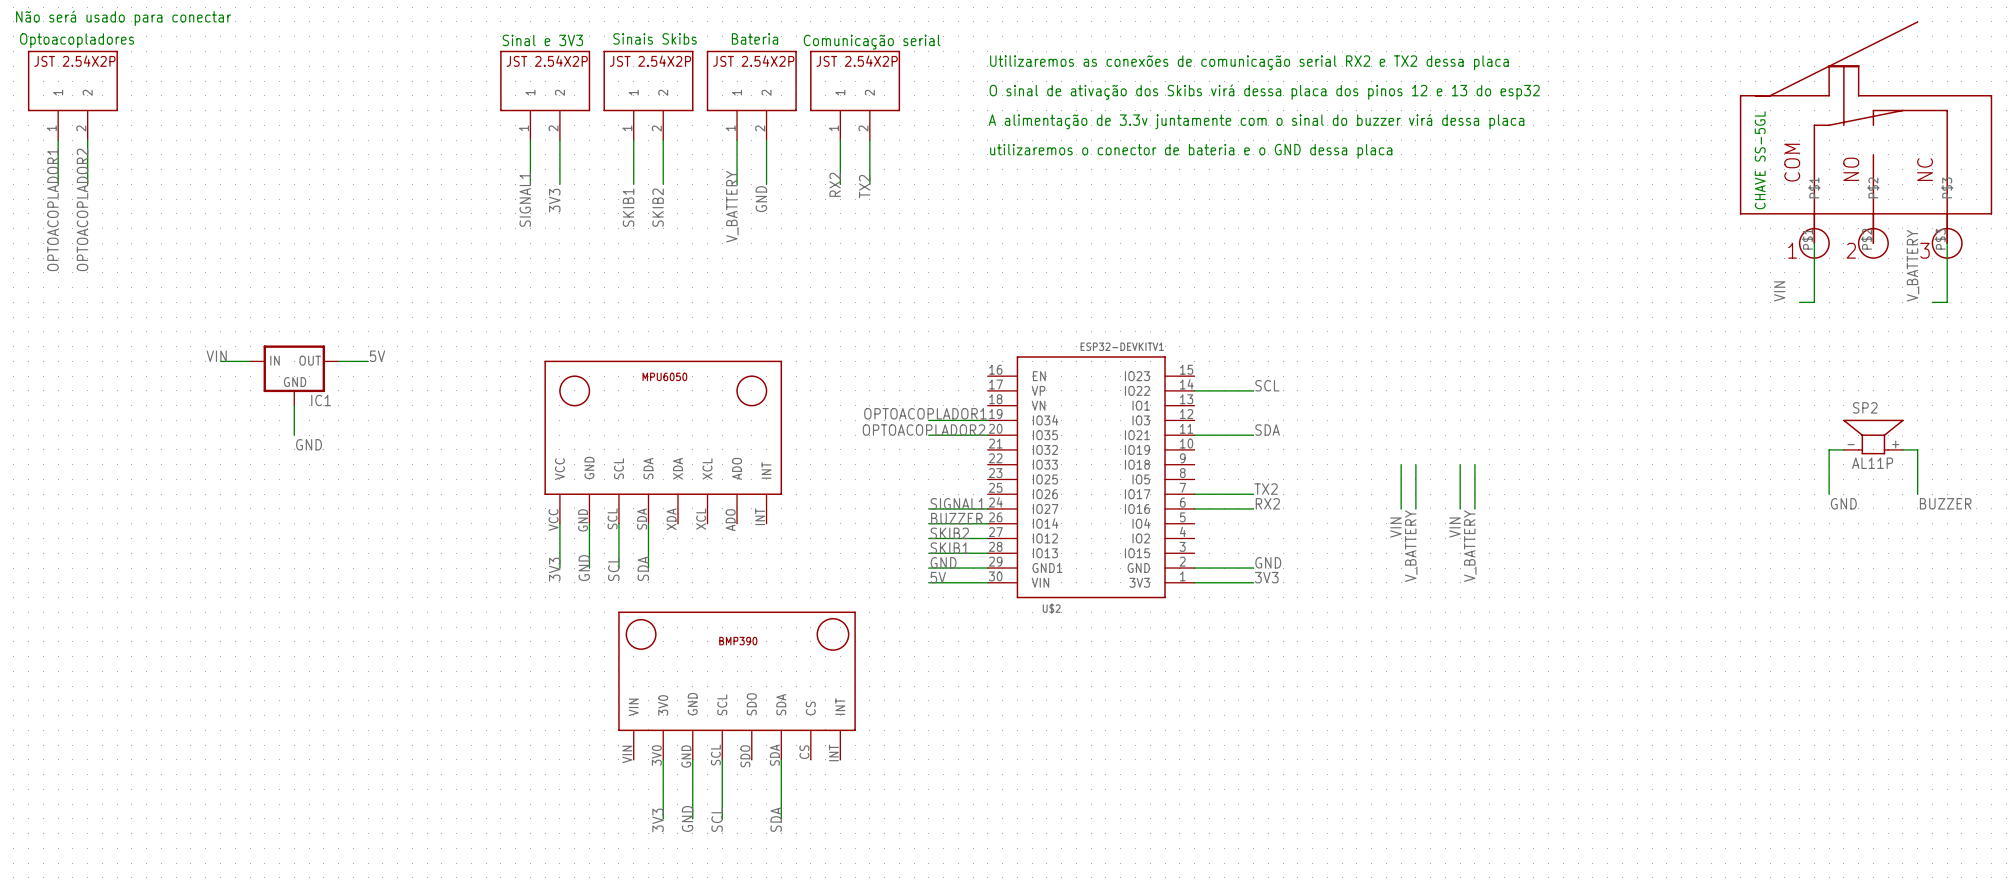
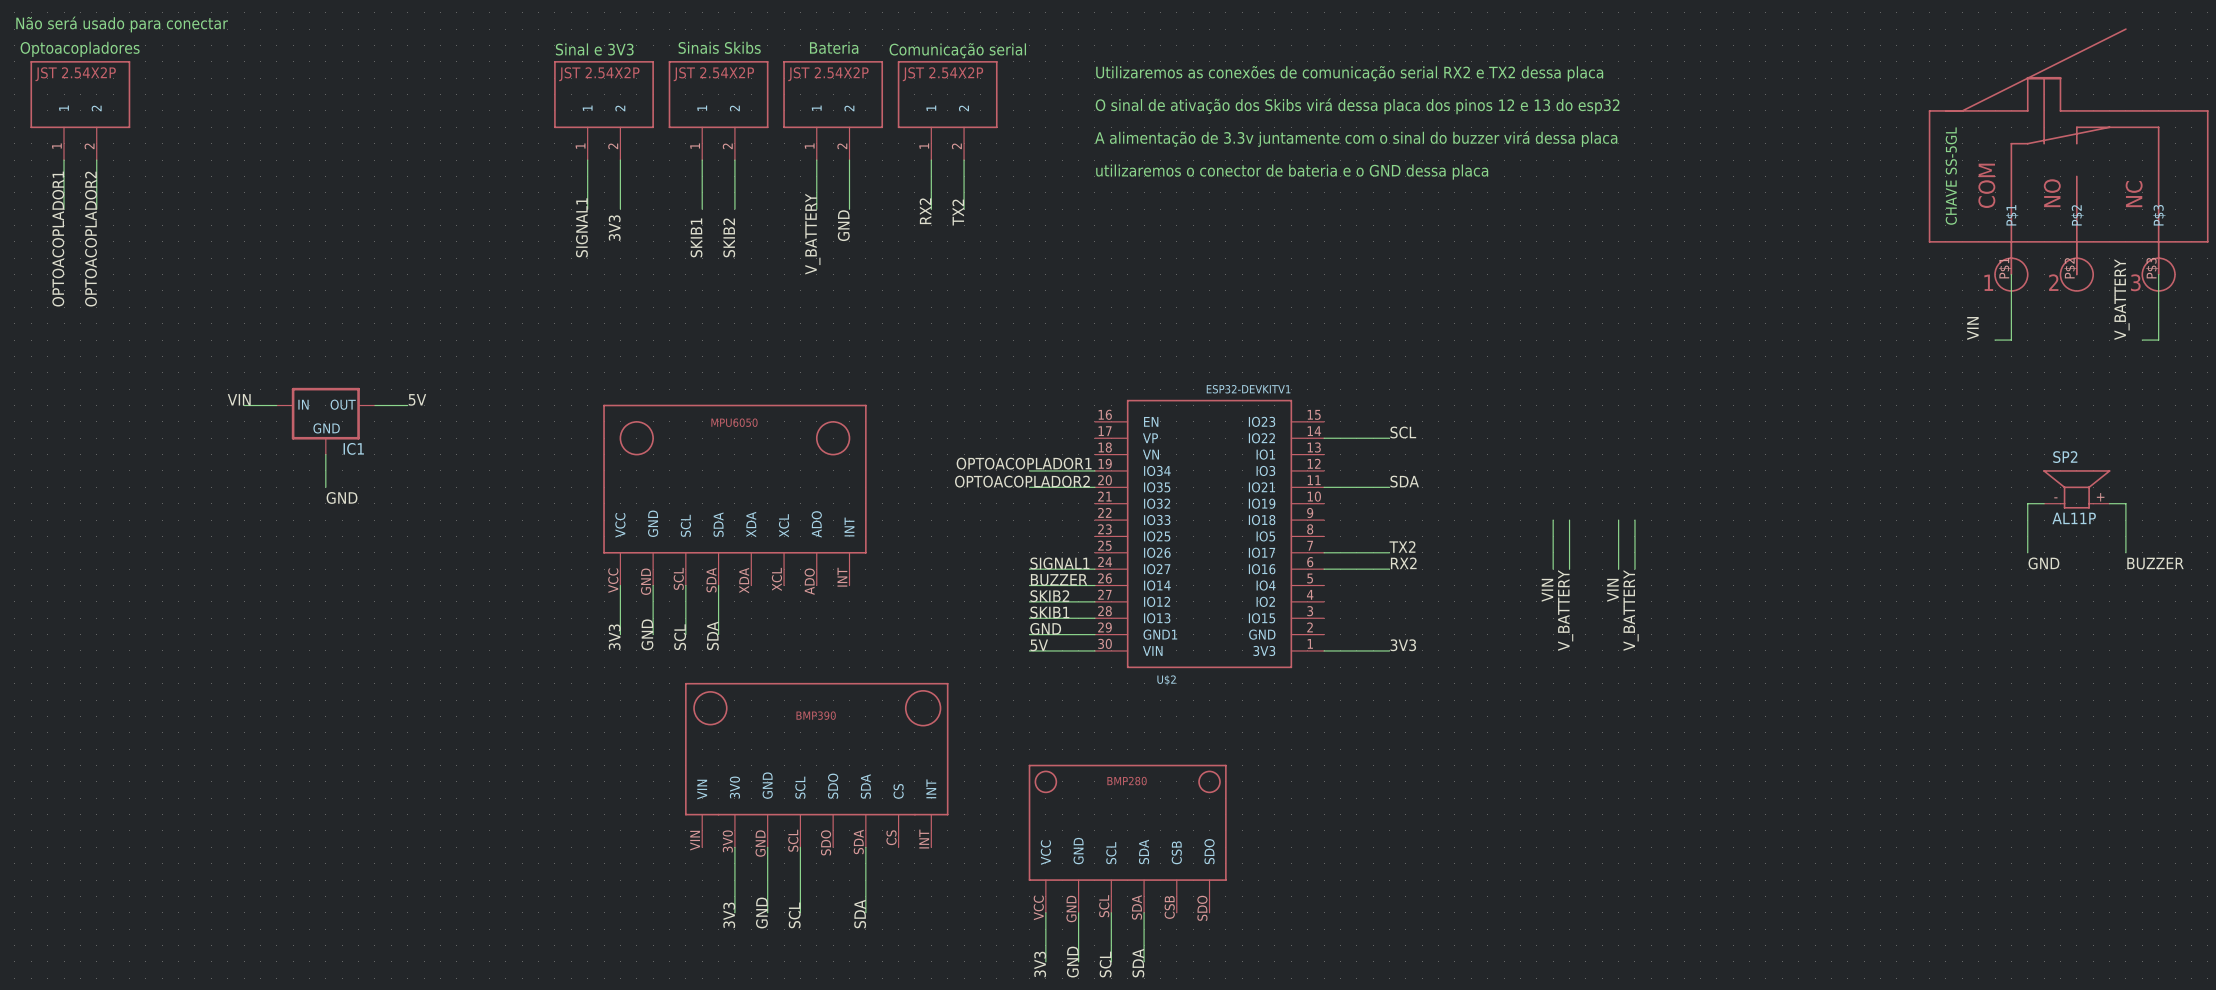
label: GND (1268, 562) -> none
wire: (1194, 568) (1253, 568) -> none
part: none -> (1127, 838)
wire: none -> (1045, 912) (1045, 961)
wire: none -> (1078, 912) (1078, 961)
wire: none -> (1111, 912) (1111, 961)
wire: none -> (1144, 912) (1144, 961)
label: none -> GND (1072, 962)
label: none -> SDA (1138, 963)
label: none -> 3V3 (1040, 964)
label: none -> SCL (1105, 964)

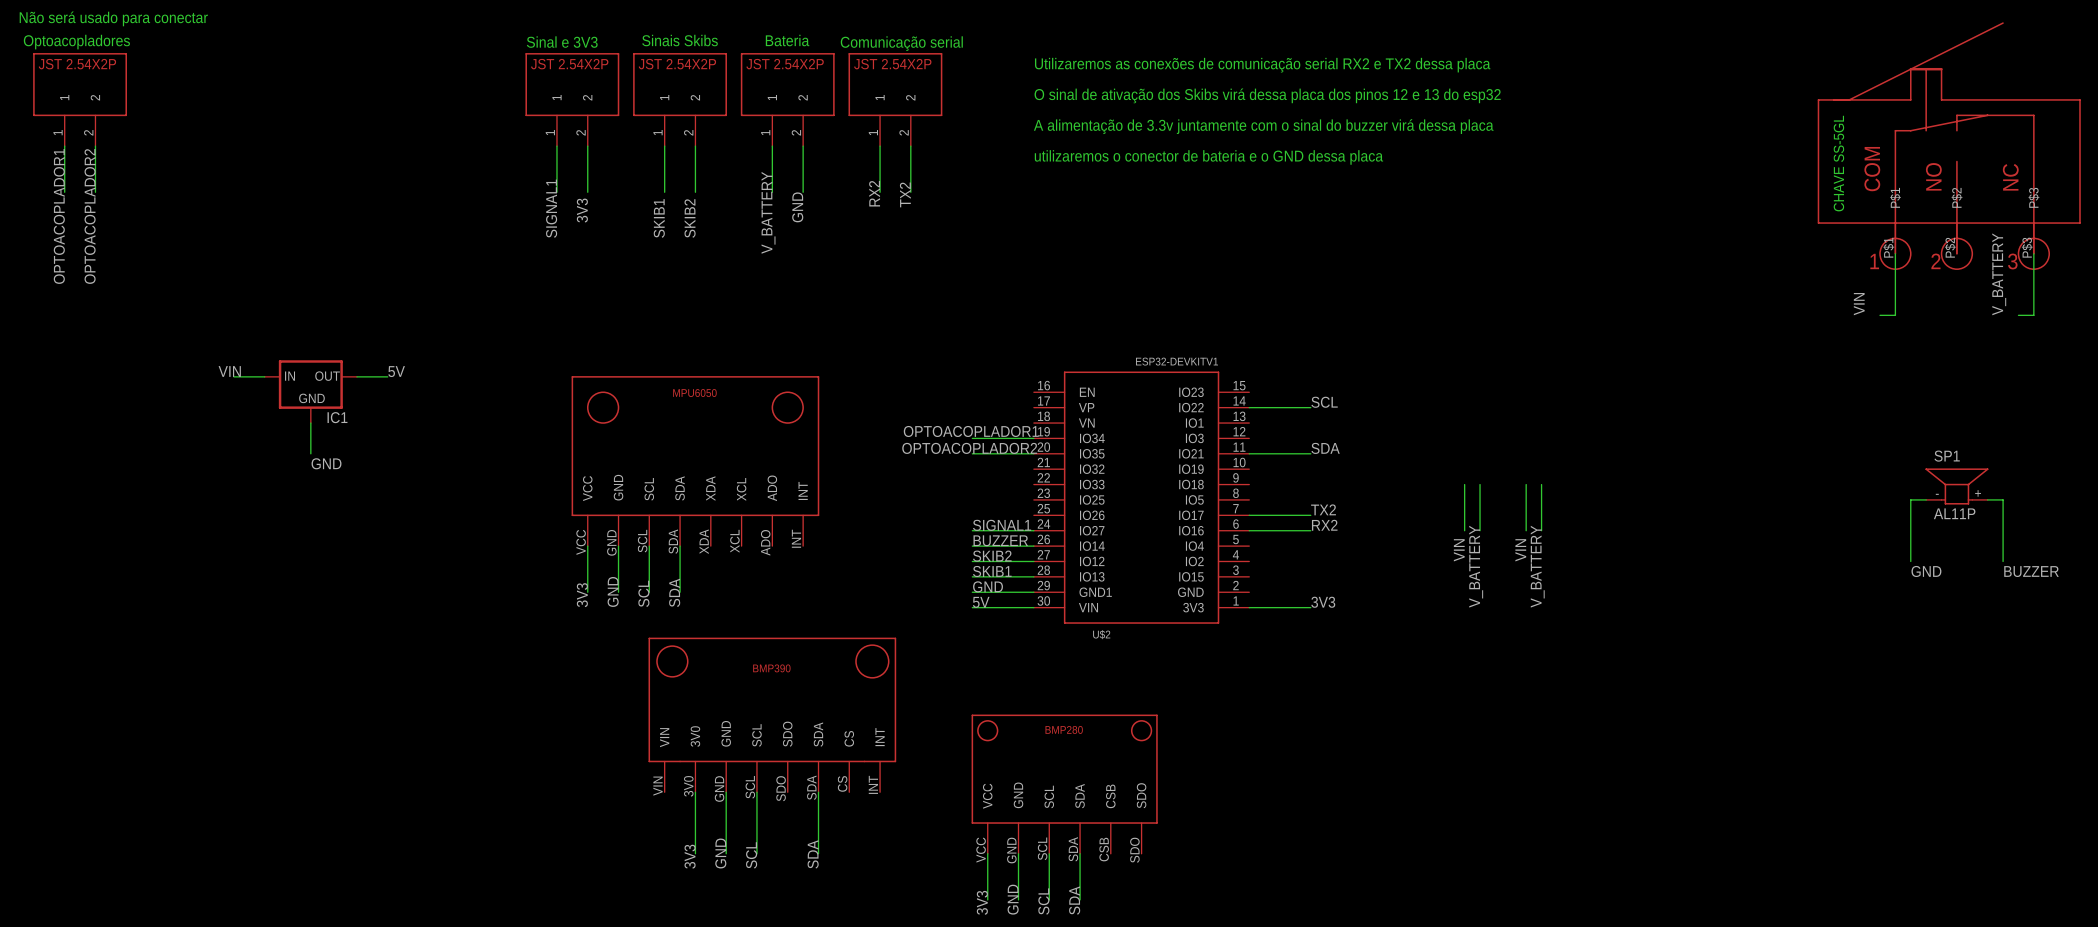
SP2: AL11P (2076, 489) -> none
wire: (2044, 503) (2027, 503) (2027, 536) -> (1926, 499) (1910, 499)
wire: (2109, 503) (2125, 503) (2125, 536) -> (1987, 499) (2003, 499)
SP1: none -> AL11P (1956, 486)
wire: none -> (1910, 515) (1910, 561)
wire: none -> (2003, 515) (2003, 561)
label position: GND (2043, 563) -> GND (1926, 571)
label position: BUZZER (2155, 563) -> BUZZER (2031, 571)

